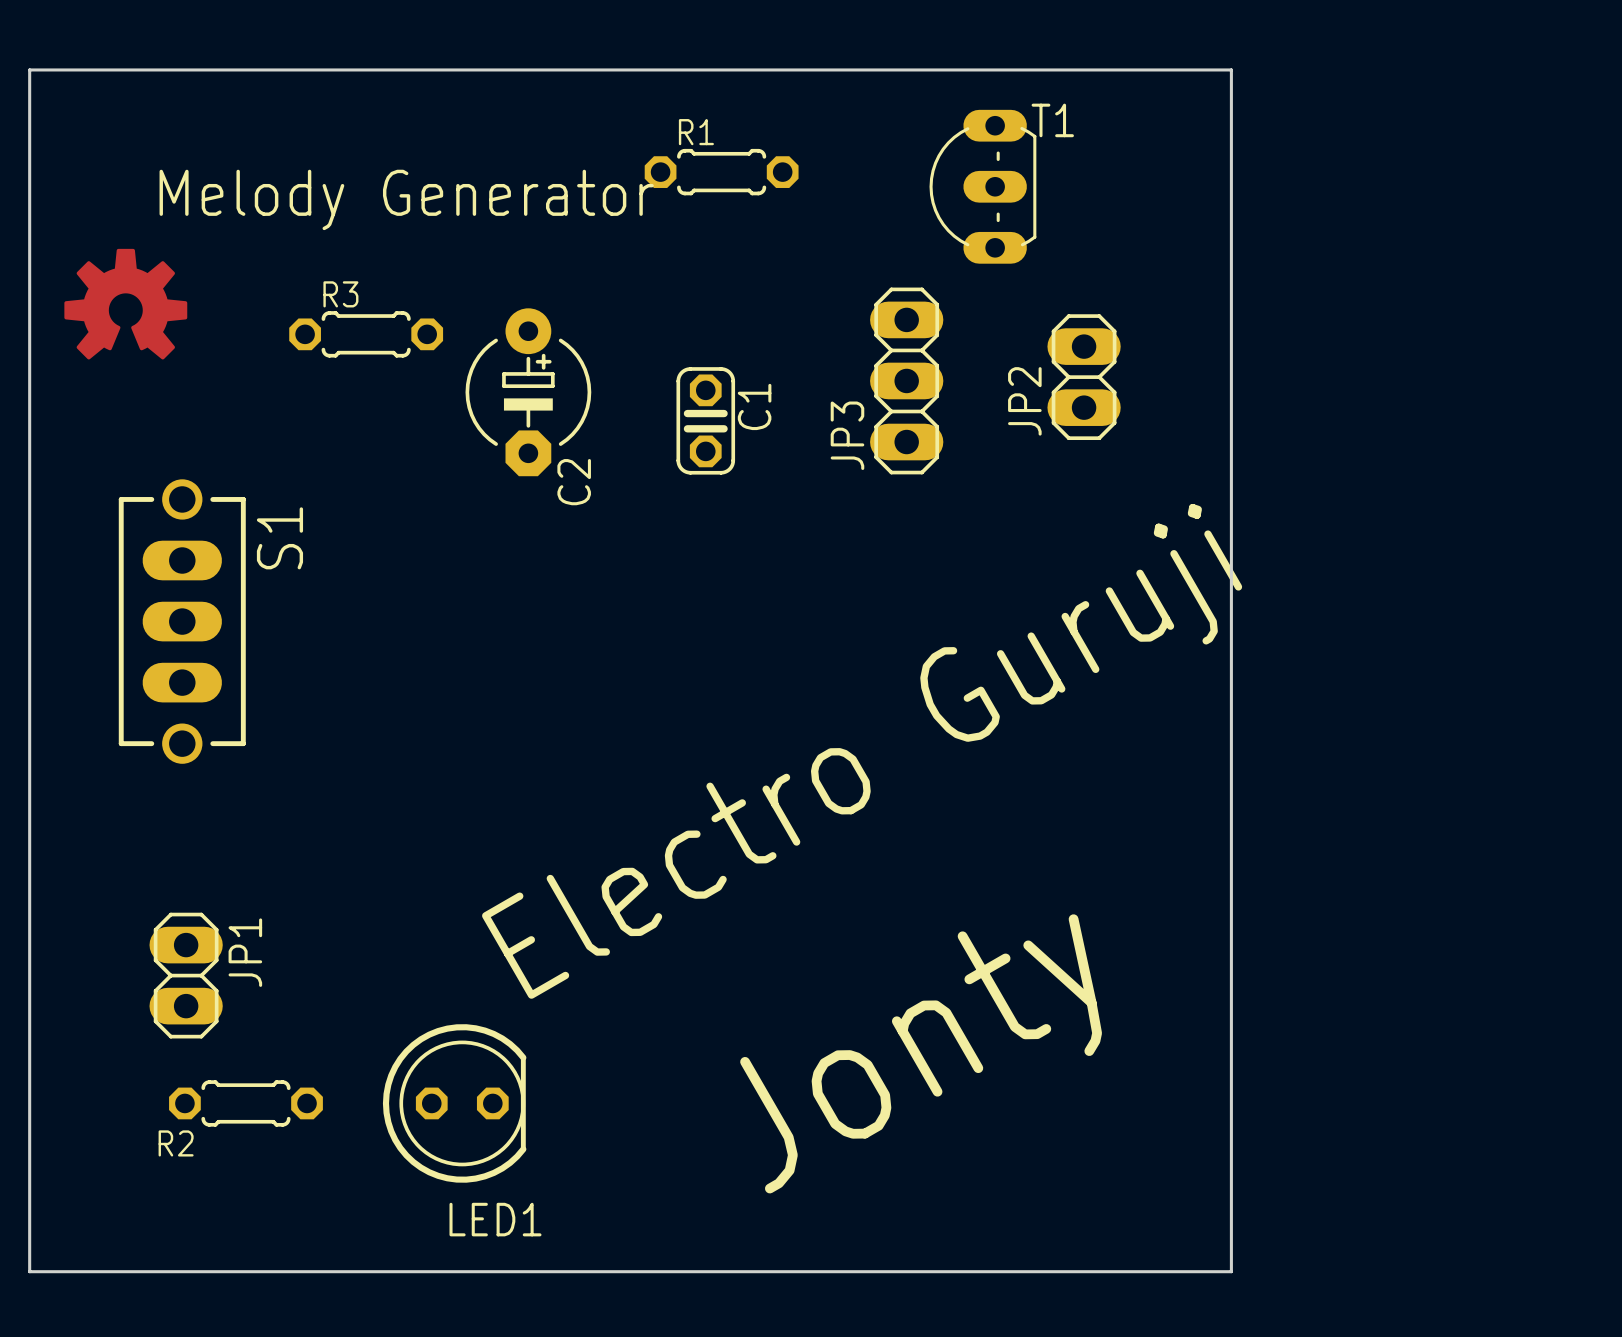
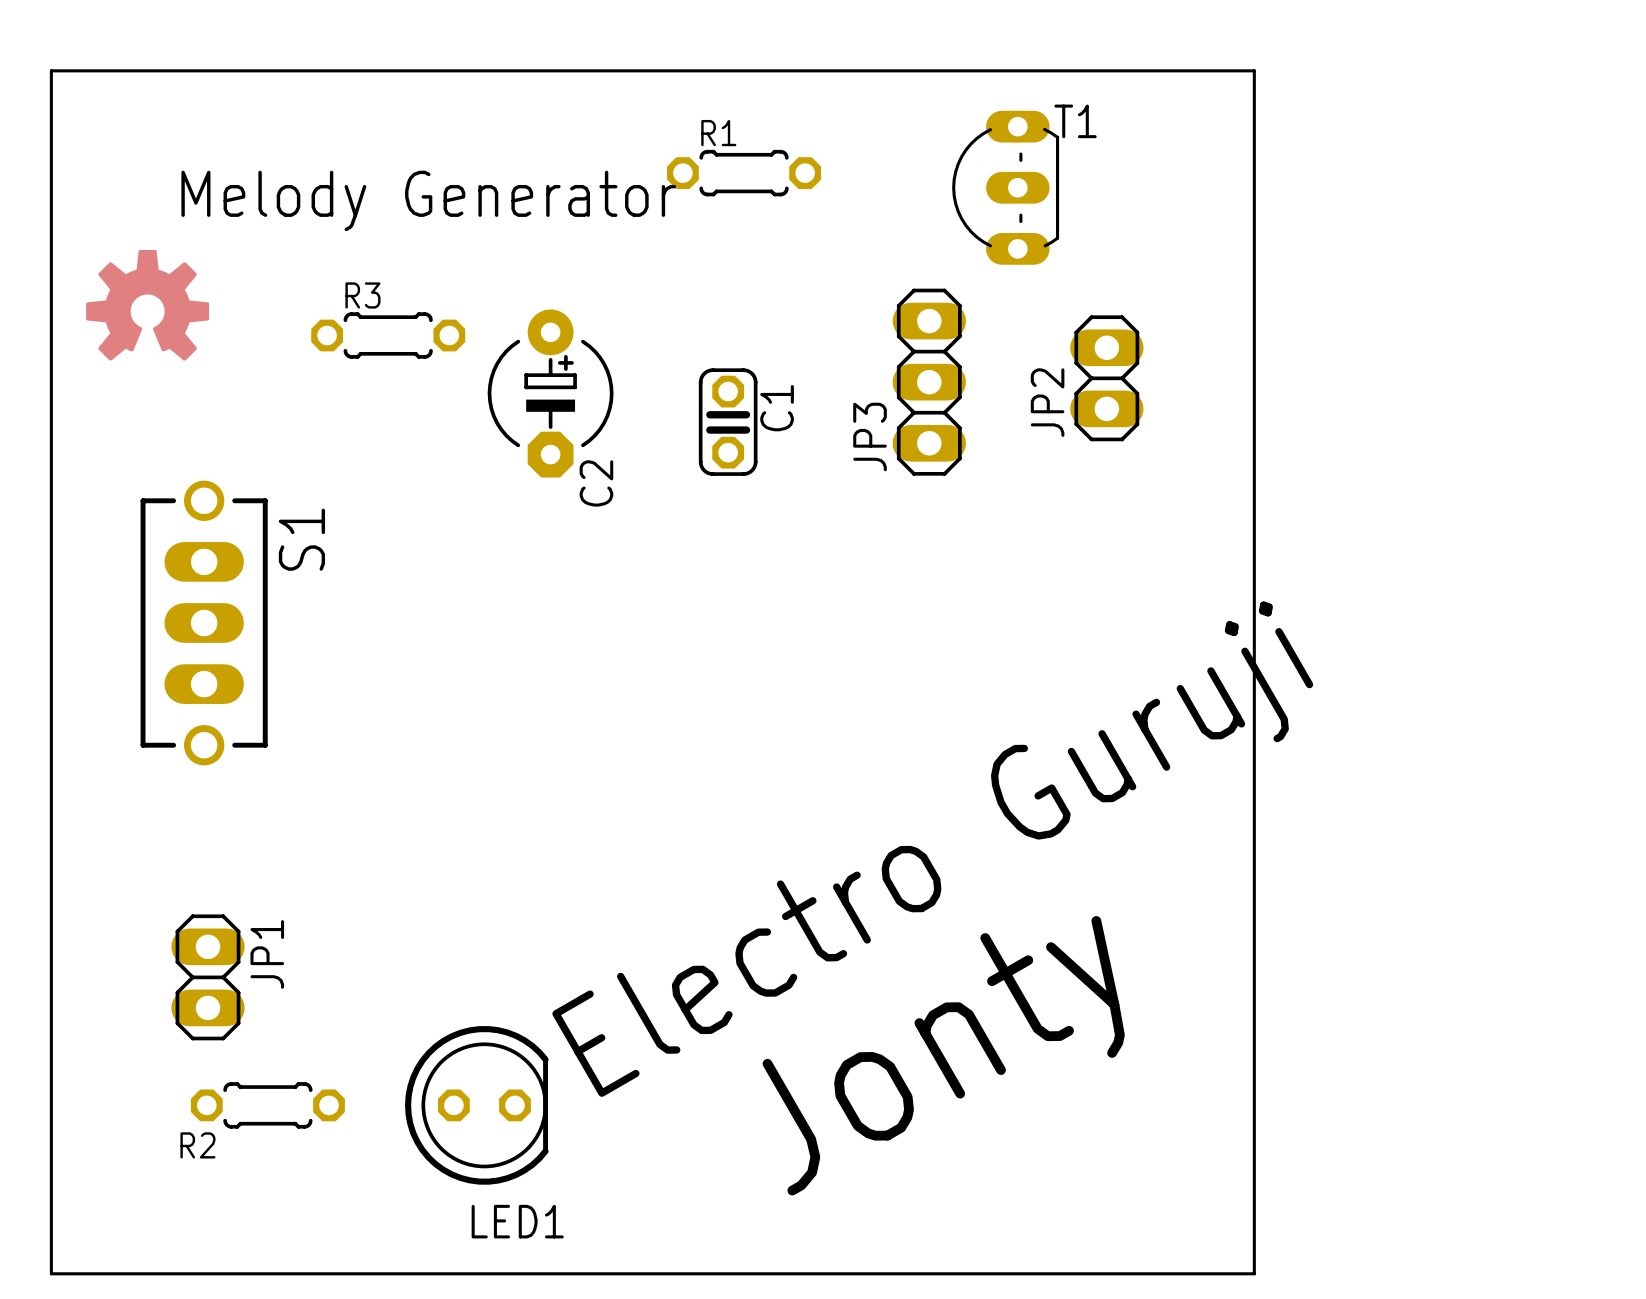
text position: Electro Guruji (862, 751) -> Electro Guruji (932, 849)

